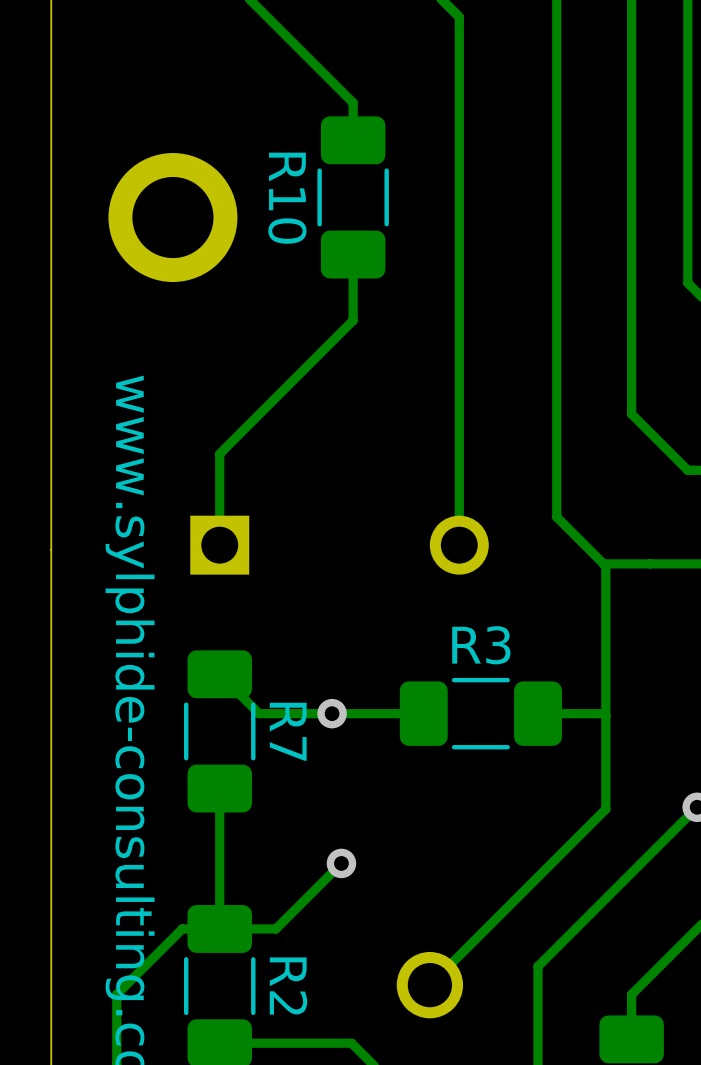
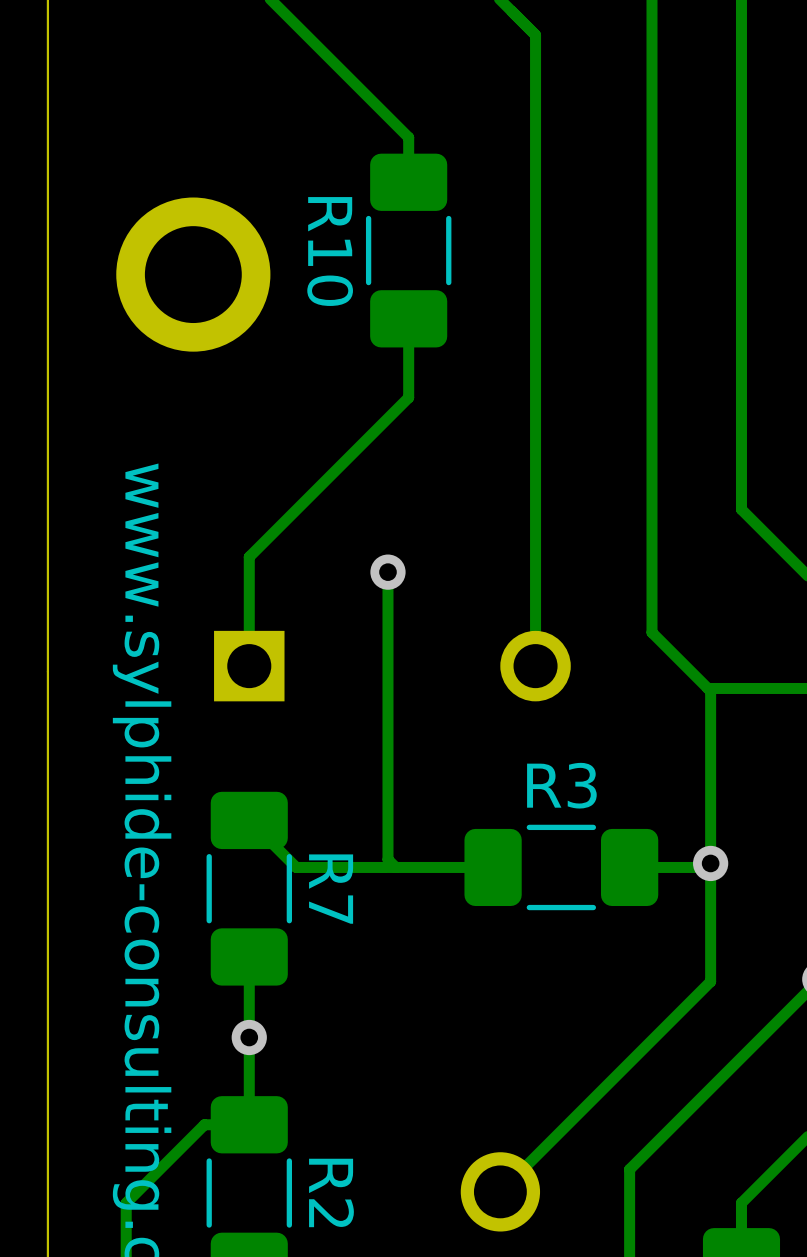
track: none -> (387, 572) (387, 859) (395, 867)
via: none -> (387, 572)
via: none -> (710, 863)
via: (332, 713) -> none
via: none -> (249, 1037)
track: (341, 863) (275, 928) (219, 928) -> none
via: (341, 863) -> none

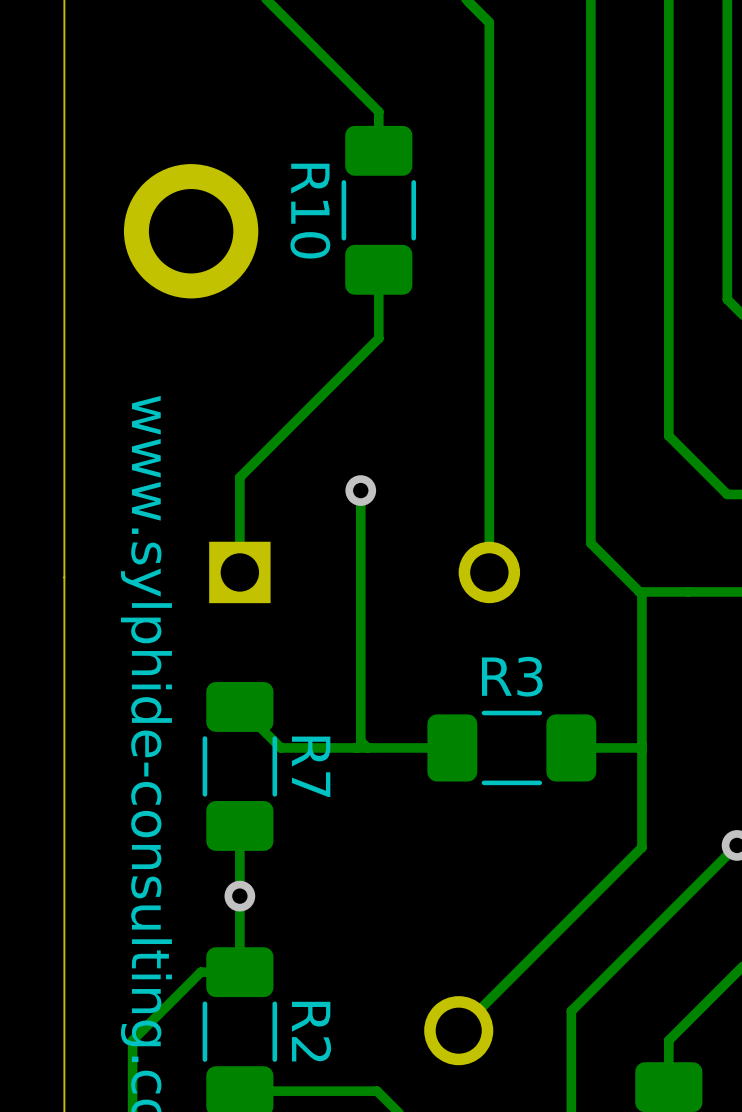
via: (710, 863) -> none

